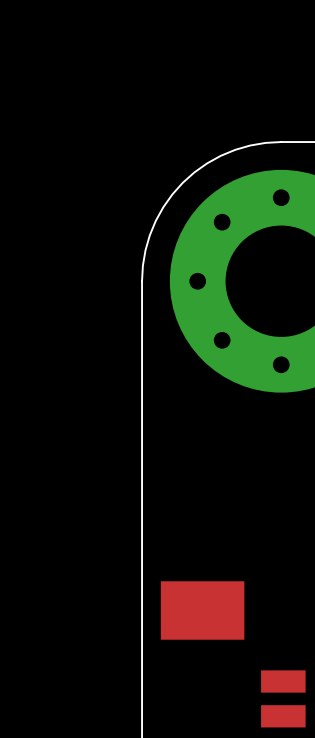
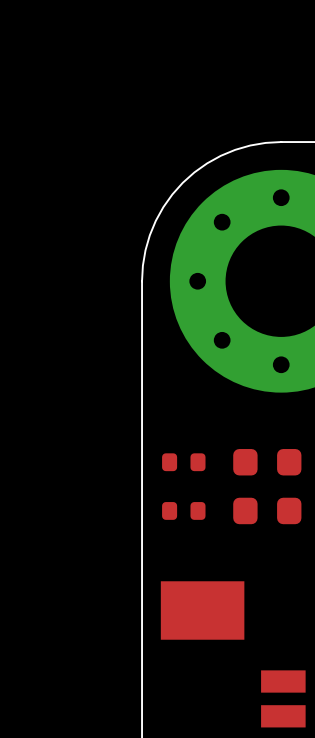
part: none -> (183, 462)
part: none -> (267, 462)
part: none -> (183, 510)
part: none -> (267, 510)

